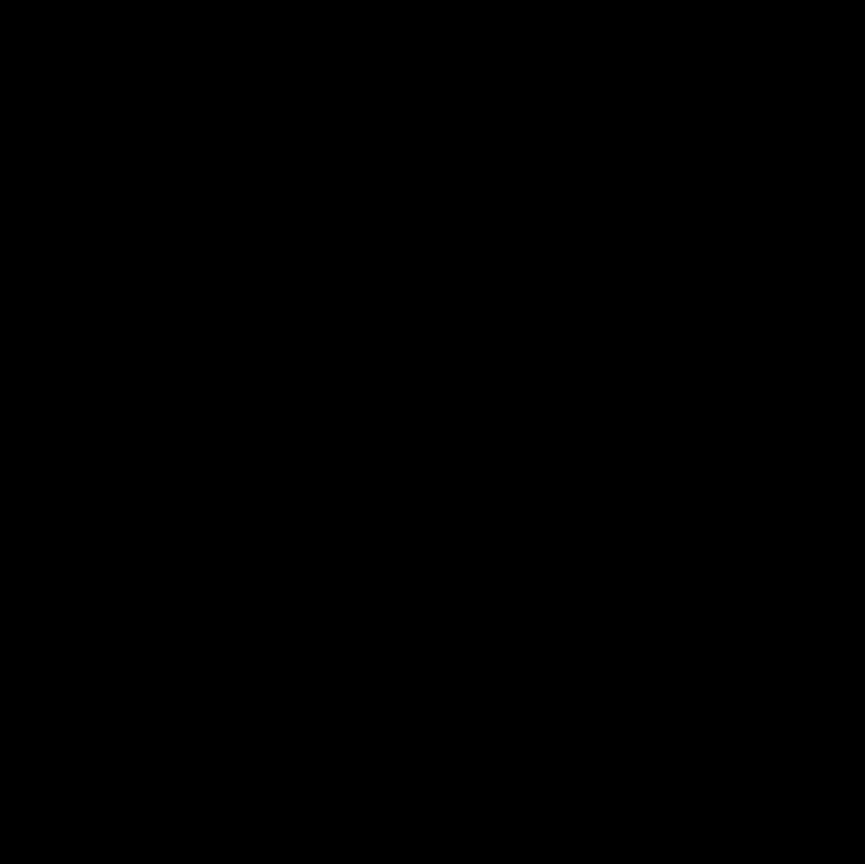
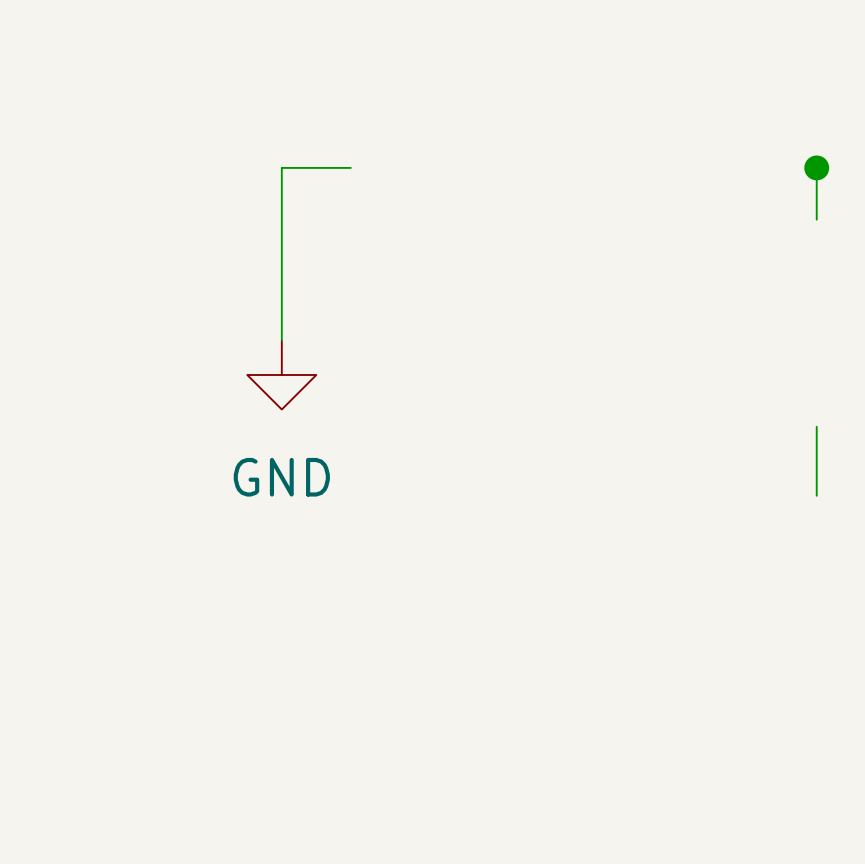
wire: none -> (350, 167) (281, 167) (281, 340)
wire: none -> (816, 167) (816, 219)
junction: none -> (816, 167)
power symbol: none -> GND (281, 374)
wire: none -> (816, 426) (816, 495)

